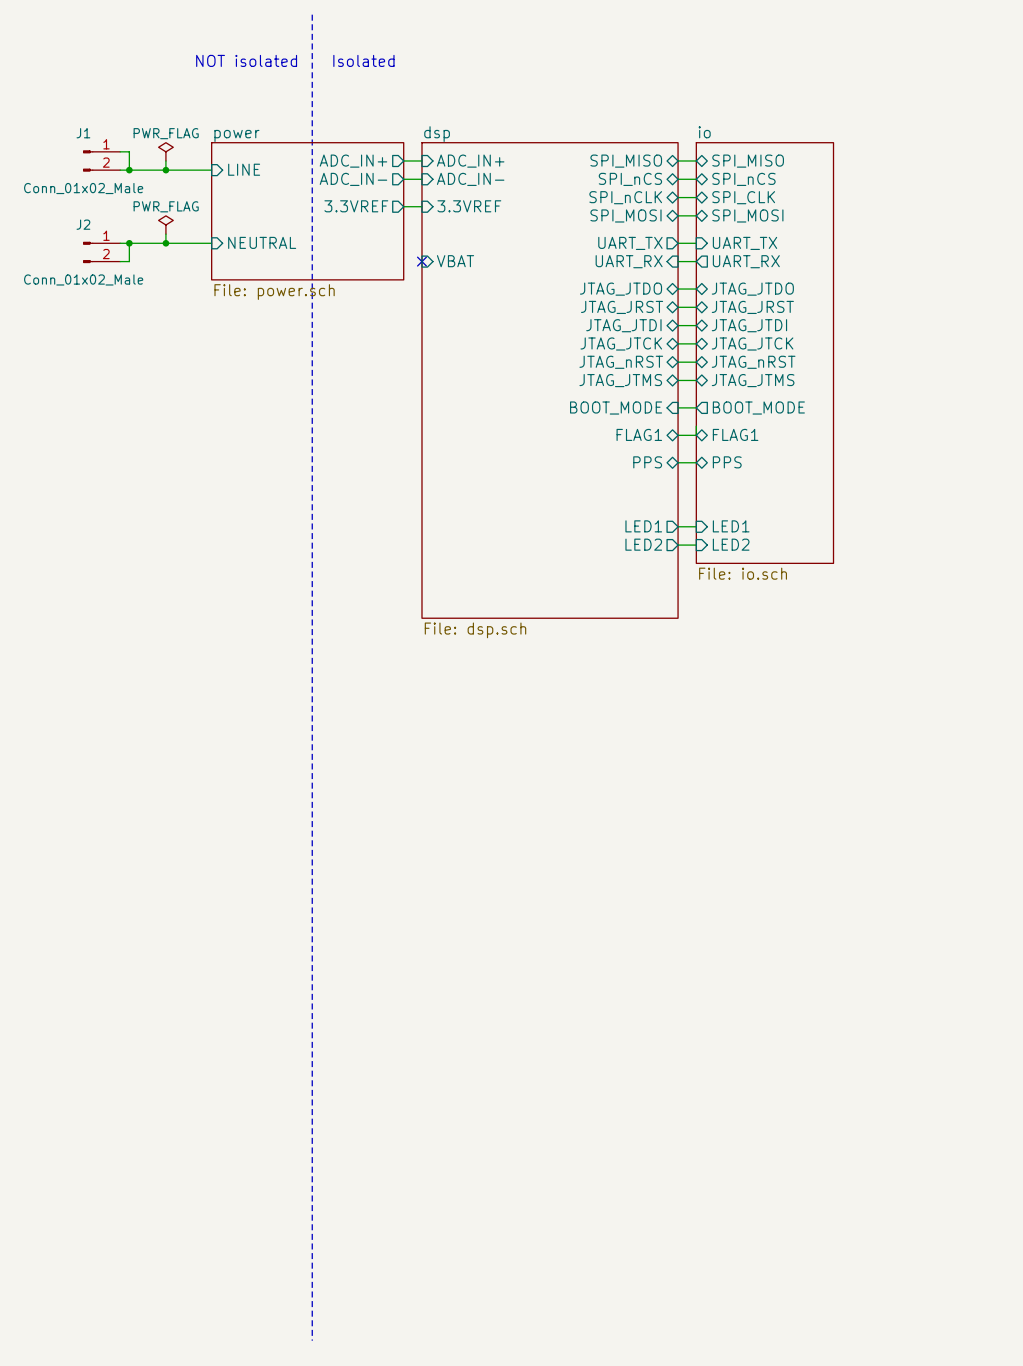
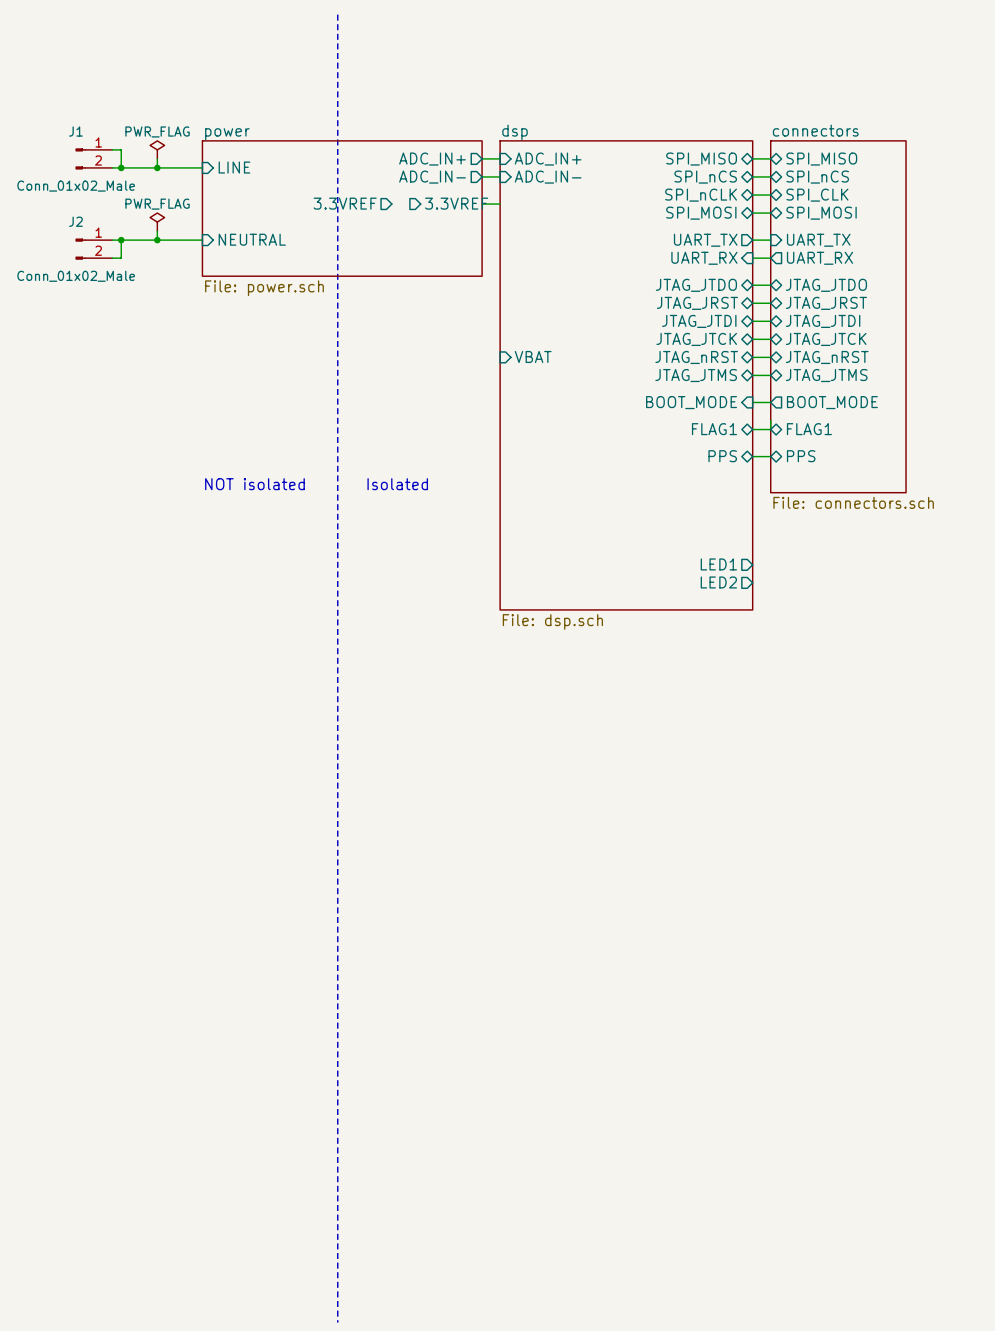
line: (312, 14) (312, 1340) -> (337, 14) (337, 1322)
text: NOT isolated (246, 60) -> none
text: Isolated (363, 60) -> none
wire: (403, 160) (421, 160) -> (482, 158) (500, 158)
wire: (678, 160) (696, 160) -> (752, 158) (770, 158)
sheet pin: ADC_IN+ (353, 161) -> none
sheet pin: none -> ADC_IN+ (432, 159)
sheet pin: ADC_IN+ (470, 161) -> none
sheet pin: none -> ADC_IN+ (548, 159)
sheet pin: SPI_MISO (626, 161) -> none
sheet pin: none -> SPI_MISO (701, 159)
sheet pin: SPI_MISO (748, 161) -> none
sheet pin: none -> SPI_MISO (821, 159)
sheet pin: ADC_IN- (353, 179) -> none
wire: (403, 179) (421, 179) -> (482, 176) (500, 176)
sheet pin: none -> ADC_IN- (432, 177)
sheet pin: ADC_IN- (470, 179) -> none
sheet pin: none -> ADC_IN- (548, 177)
sheet pin: SPI_nCS (630, 179) -> none
wire: (678, 179) (696, 179) -> (752, 176) (770, 176)
sheet pin: none -> SPI_nCS (705, 177)
sheet pin: SPI_nCS (743, 179) -> none
sheet pin: none -> SPI_nCS (817, 177)
sheet pin position: SPI_nCLK (625, 197) -> SPI_nCLK (701, 195)
wire: (678, 197) (696, 197) -> (752, 195) (770, 195)
sheet pin position: SPI_CLK (743, 197) -> SPI_CLK (817, 195)
wire: (403, 206) (421, 206) -> (482, 204) (500, 204)
sheet power: File: power.sch (307, 211) -> none
sheet power: none -> File: power.sch (342, 208)
sheet pin: SPI_MOSI (625, 215) -> none
wire: (678, 215) (696, 215) -> (752, 213) (770, 213)
sheet pin: none -> SPI_MOSI (701, 213)
sheet pin: SPI_MOSI (747, 215) -> none
sheet pin: none -> SPI_MOSI (821, 213)
sheet pin: UART_TX (630, 243) -> none
wire: (678, 243) (696, 243) -> (752, 240) (770, 240)
sheet pin: none -> UART_TX (705, 240)
sheet pin: UART_TX (745, 243) -> none
sheet pin: none -> UART_TX (818, 240)
no-connect mark: (421, 261) -> none
sheet pin position: VBAT (455, 261) -> VBAT (533, 356)
sheet pin: UART_RX (629, 261) -> none
wire: (678, 261) (696, 261) -> (752, 258) (770, 258)
sheet pin: none -> UART_RX (704, 258)
sheet pin: UART_RX (746, 261) -> none
sheet pin: none -> UART_RX (820, 258)
sheet pin: JTAG_JTDO (621, 289) -> none
wire: (678, 289) (696, 289) -> (752, 285) (770, 285)
sheet pin: none -> JTAG_JTDO (696, 285)
sheet pin: JTAG_JTDO (752, 289) -> none
sheet pin: none -> JTAG_JTDO (826, 285)
sheet pin: JTAG_JRST (622, 307) -> none
wire: (678, 307) (696, 307) -> (752, 303) (770, 303)
sheet pin: none -> JTAG_JRST (697, 303)
sheet pin: JTAG_JRST (752, 307) -> none
sheet pin: none -> JTAG_JRST (826, 303)
sheet connectors: none -> File: connectors.sch (838, 316)
sheet pin: JTAG_JTDI (623, 325) -> none
wire: (678, 325) (696, 325) -> (752, 321) (770, 321)
sheet pin: none -> JTAG_JTDI (699, 321)
sheet pin: JTAG_JTDI (749, 325) -> none
sheet pin: none -> JTAG_JTDI (823, 321)
wire: (678, 343) (696, 343) -> (752, 339) (770, 339)
sheet pin: JTAG_JTCK (621, 344) -> none
sheet pin: none -> JTAG_JTCK (696, 339)
sheet pin: JTAG_JTCK (752, 344) -> none
sheet pin: none -> JTAG_JTCK (826, 339)
sheet io: File: io.sch (764, 353) -> none
sheet pin: JTAG_nRST (621, 362) -> none
wire: (678, 362) (696, 362) -> (752, 357) (770, 357)
sheet pin: none -> JTAG_nRST (696, 357)
sheet pin: JTAG_nRST (753, 362) -> none
sheet pin: none -> JTAG_nRST (827, 357)
sheet dsp position: (550, 380) -> (626, 375)
sheet pin: JTAG_JTMS (620, 380) -> none
wire: (678, 380) (696, 380) -> (752, 375) (770, 375)
sheet pin: none -> JTAG_JTMS (696, 375)
sheet pin: JTAG_JTMS (753, 380) -> none
sheet pin: none -> JTAG_JTMS (826, 375)
wire: (678, 407) (696, 407) -> (752, 402) (770, 402)
sheet pin: BOOT_MODE (616, 408) -> none
sheet pin: none -> BOOT_MODE (691, 402)
sheet pin: BOOT_MODE (758, 408) -> none
sheet pin: none -> BOOT_MODE (832, 402)
wire: (696, 426) (696, 435) (678, 435) -> (770, 420) (770, 429) (752, 429)
sheet pin: FLAG1 (639, 434) -> none
sheet pin rotation: 0° (735, 434) -> 180° (714, 429)
sheet pin: none -> FLAG1 (809, 429)
sheet pin: PPS (647, 462) -> none
wire: (678, 462) (696, 462) -> (752, 456) (770, 456)
sheet pin rotation: 0° (727, 462) -> 180° (722, 456)
sheet pin: none -> PPS (801, 456)
text: none -> NOT isolated (254, 484)
text: none -> Isolated (397, 484)
sheet pin: LED1 (643, 526) -> none
wire: (678, 526) (696, 526) -> none
sheet pin: LED1 (731, 526) -> none
sheet pin: LED2 (643, 544) -> none
sheet pin: LED2 (731, 544) -> none
wire: (678, 545) (696, 545) -> none
sheet pin: none -> LED1 (718, 564)
sheet pin: none -> LED2 (718, 582)

